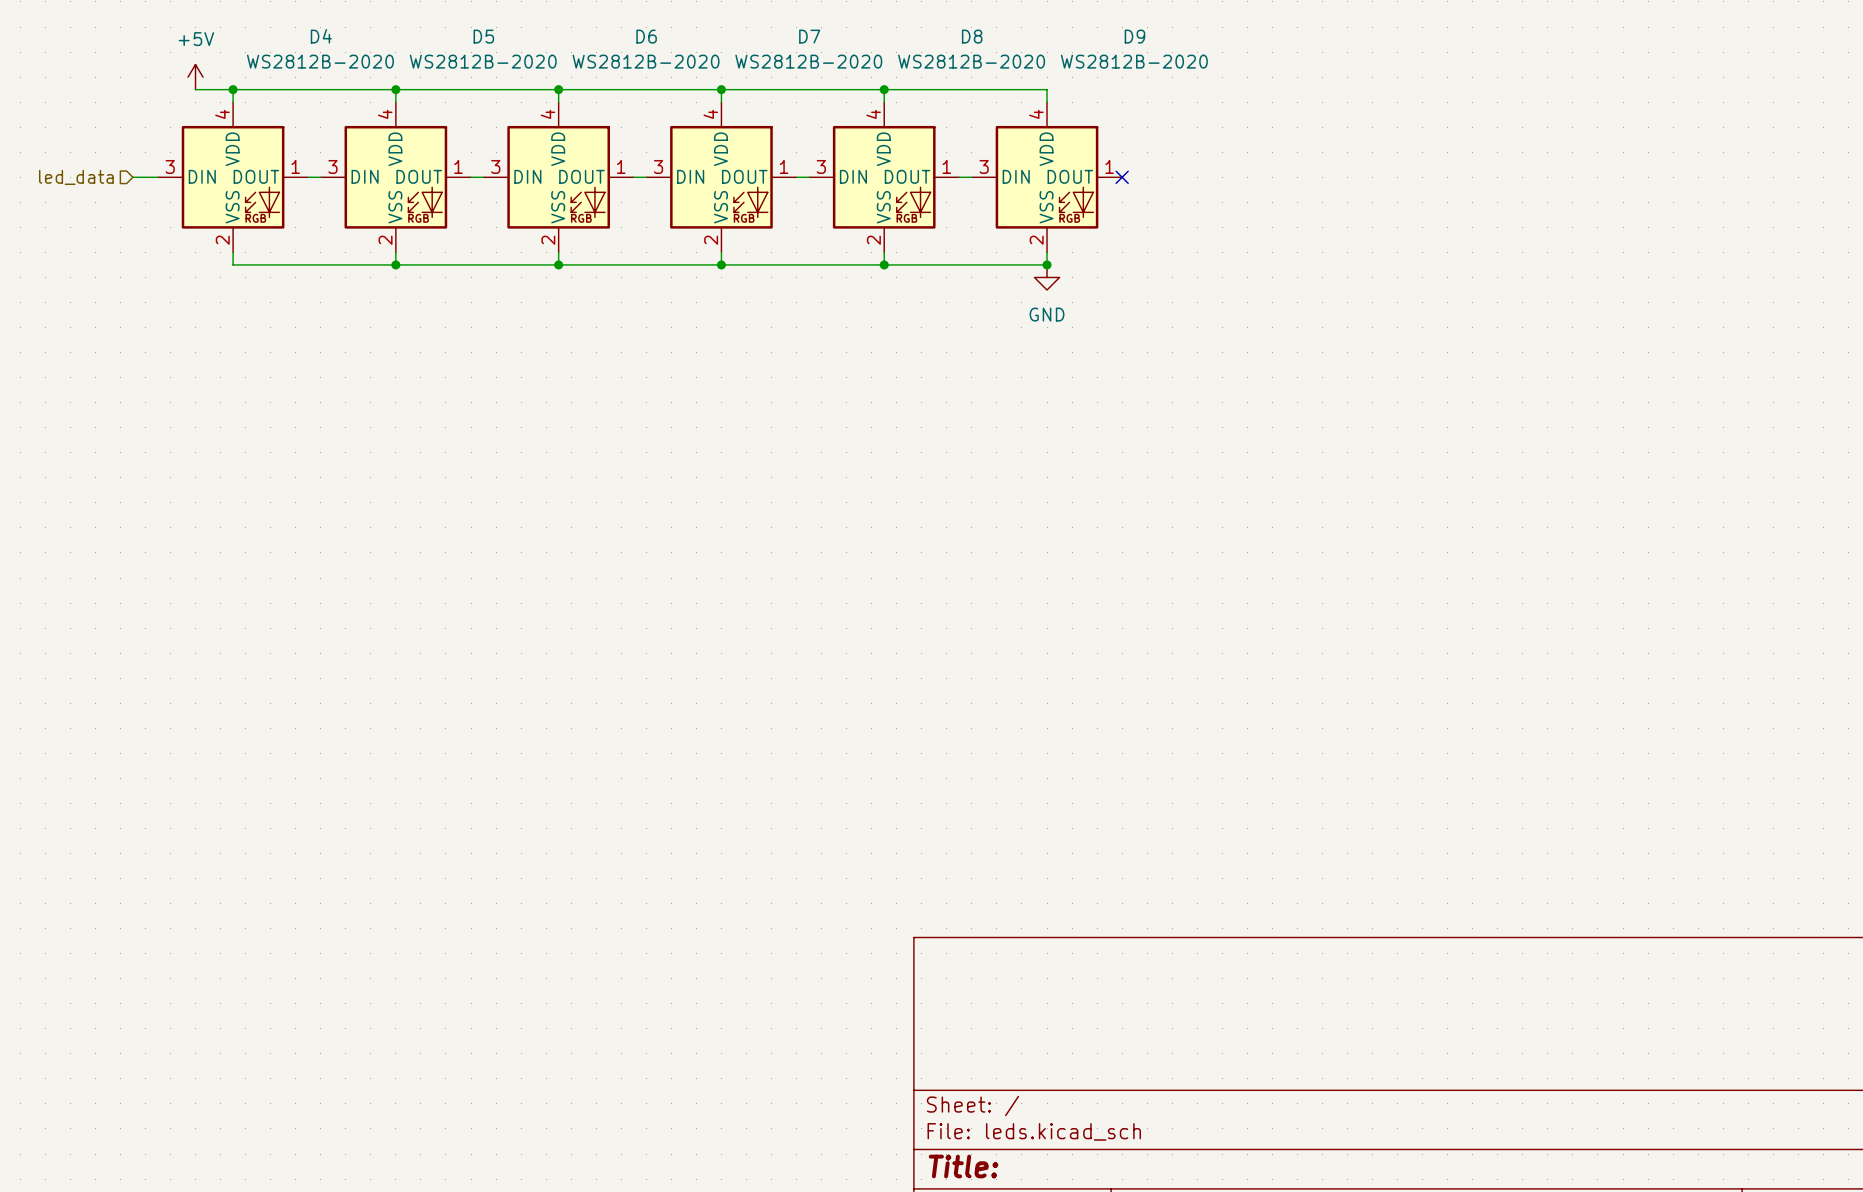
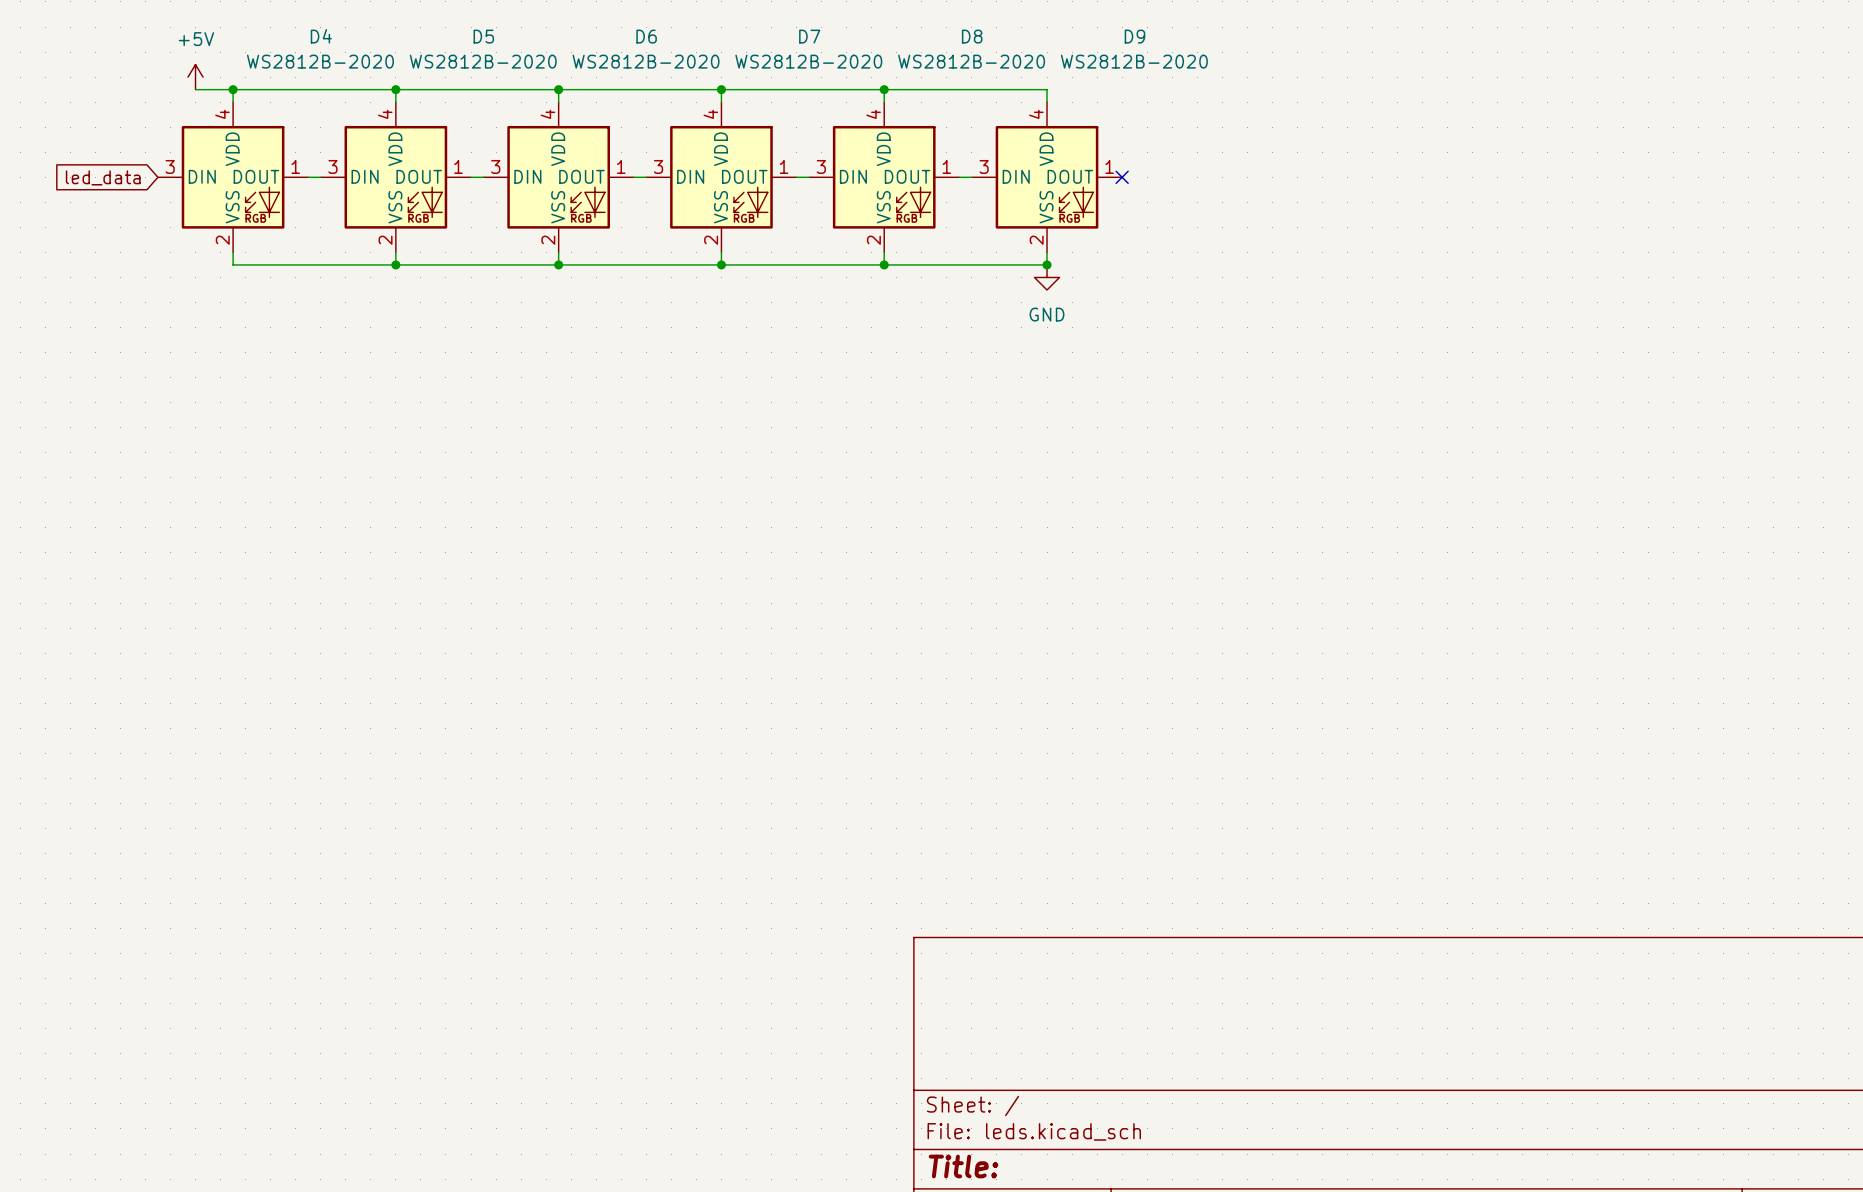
hierarchical label: led_data (76, 177) -> none
global label: none -> led_data (103, 177)
wire: (132, 177) (157, 177) -> none

